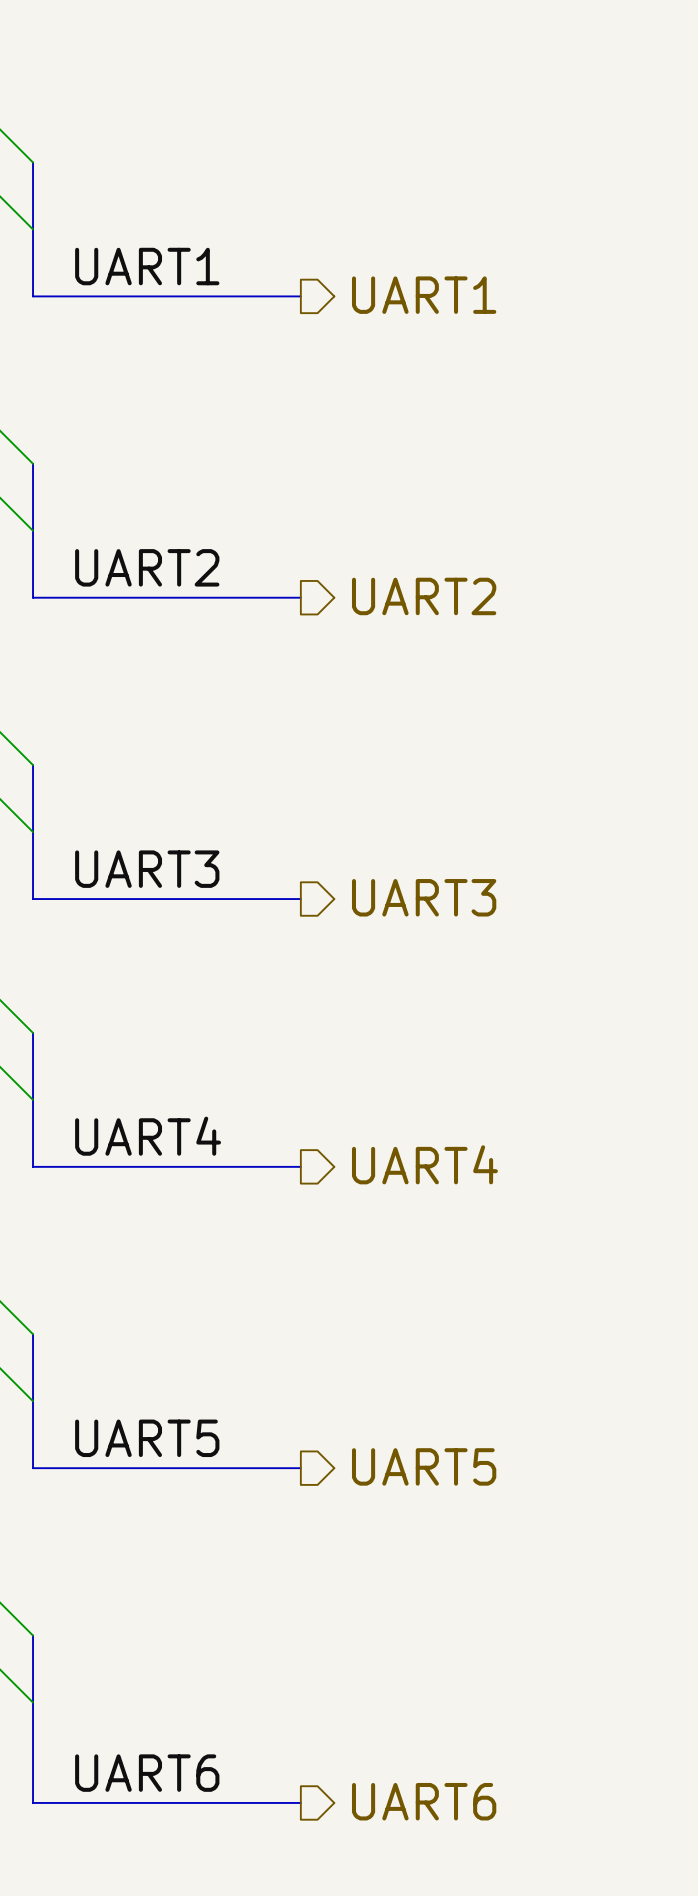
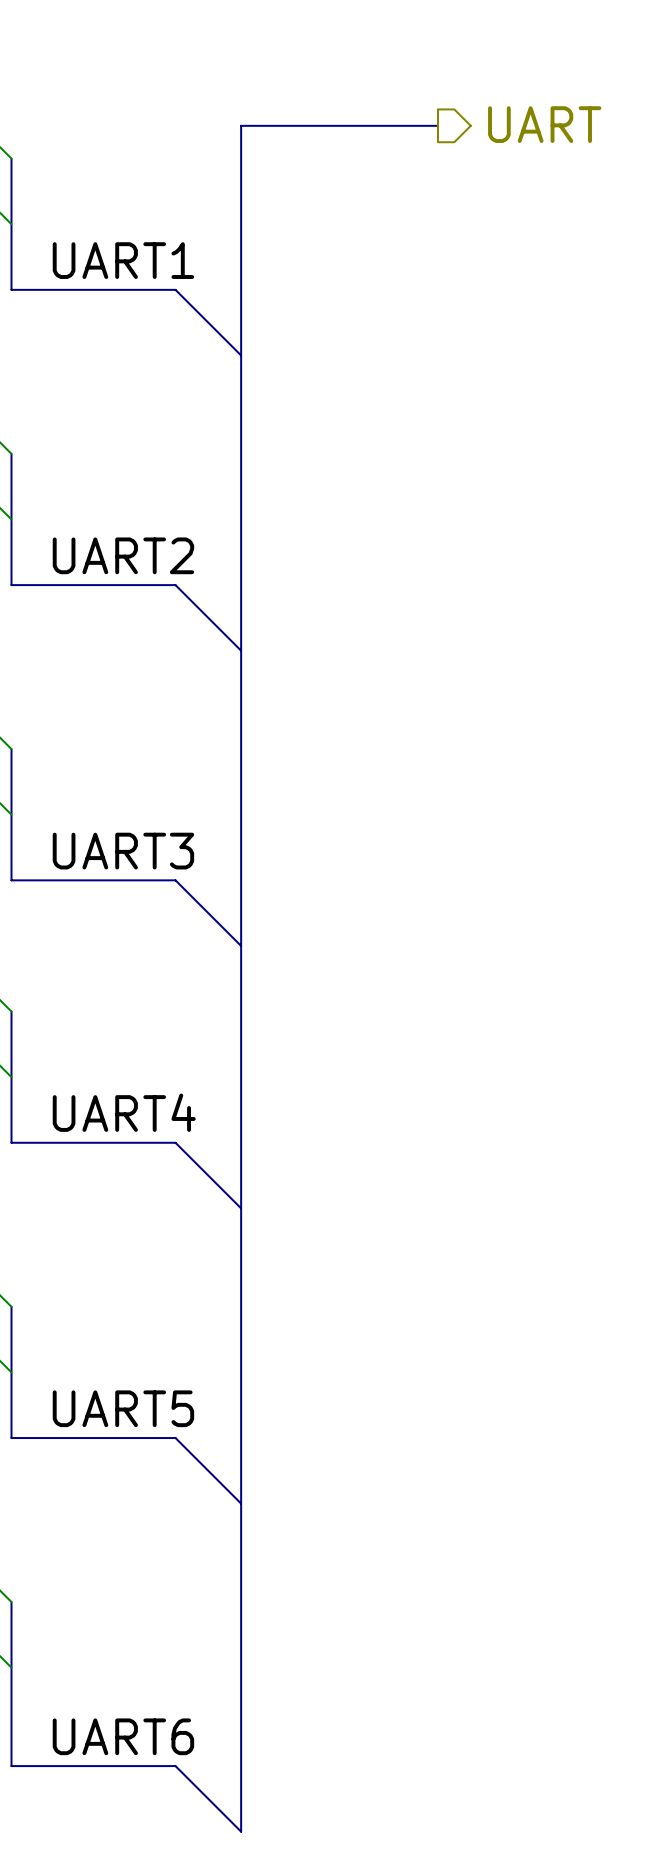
hierarchical label: none -> UART (544, 124)
hierarchical label: UART1 (424, 295) -> none
bus: (200, 296) (300, 296) -> (175, 289) (241, 355)
hierarchical label: UART2 (424, 596) -> none
bus: (200, 597) (300, 597) -> (175, 585) (241, 650)
hierarchical label: UART3 (424, 897) -> none
bus: (200, 899) (300, 899) -> (175, 880) (241, 945)
hierarchical label: UART4 (424, 1164) -> none
bus: (200, 1166) (300, 1166) -> (175, 1142) (241, 1208)
hierarchical label: UART5 (424, 1466) -> none
bus: (200, 1468) (300, 1468) -> (175, 1438) (241, 1503)
hierarchical label: UART6 (424, 1801) -> none
bus: (200, 1802) (300, 1802) -> (175, 1766) (241, 1831) (241, 125) (437, 125)

